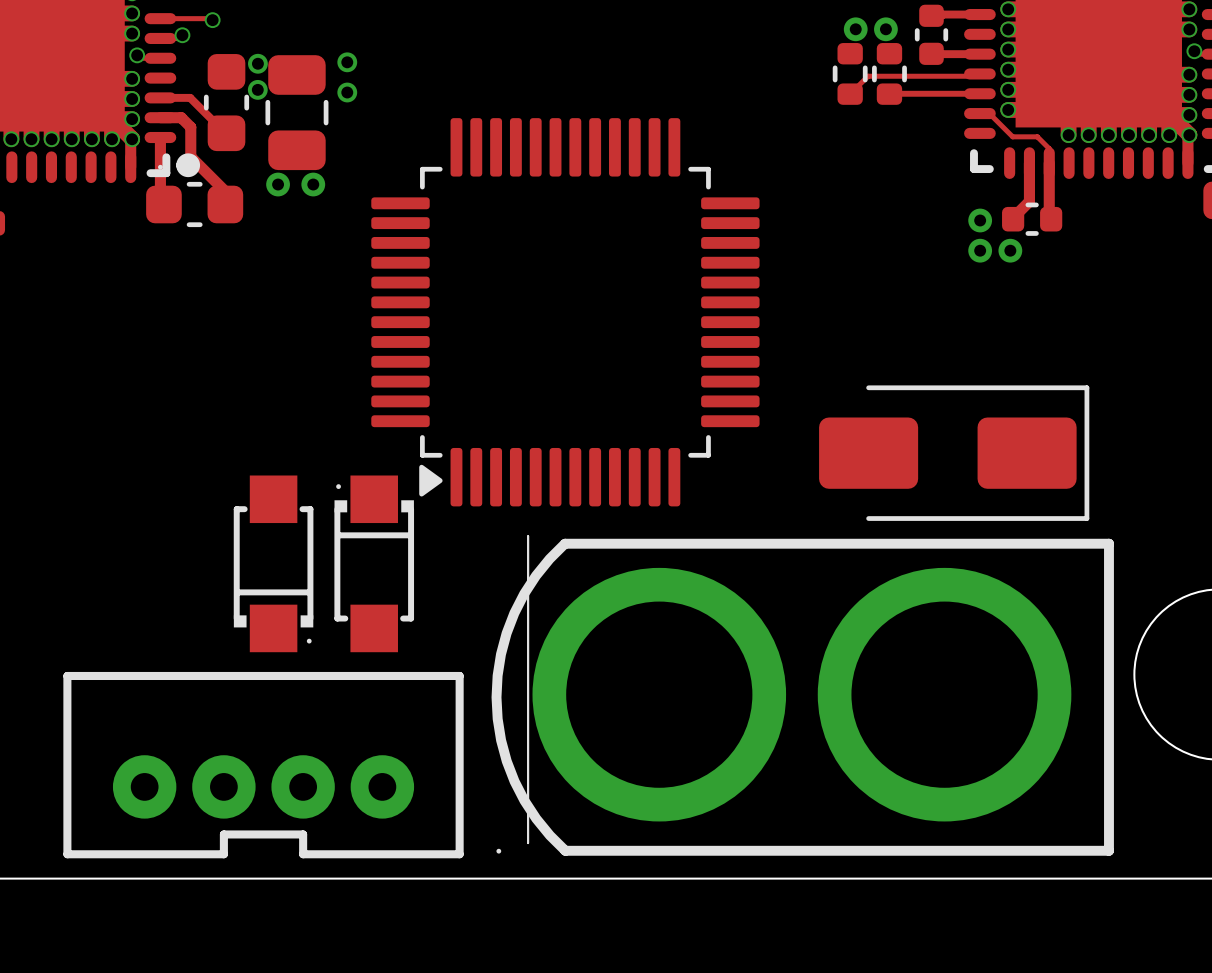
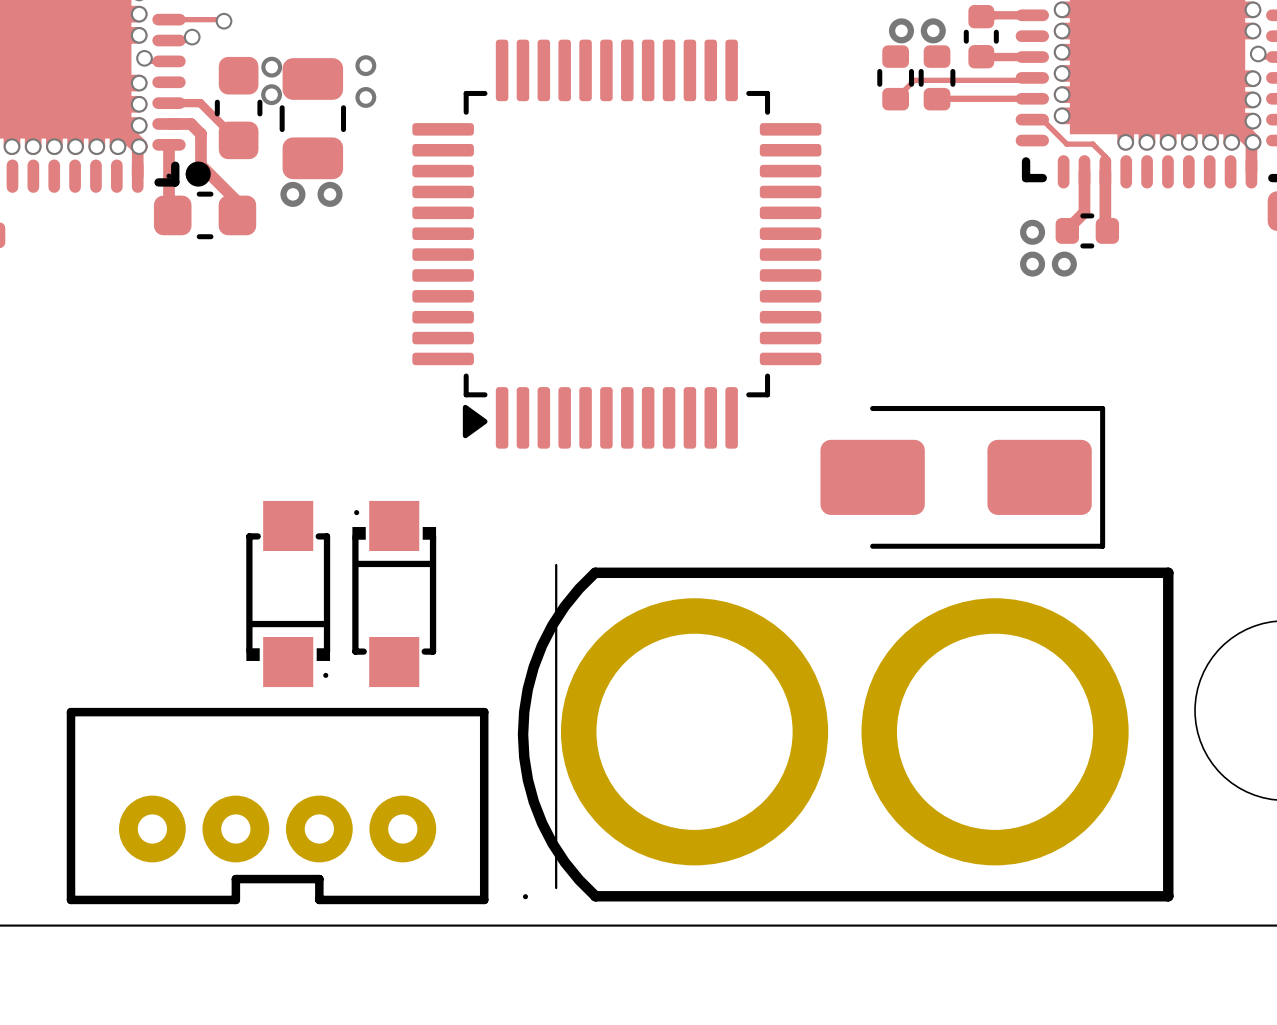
part position: (565, 312) -> (616, 244)
part position: (954, 453) -> (962, 477)

